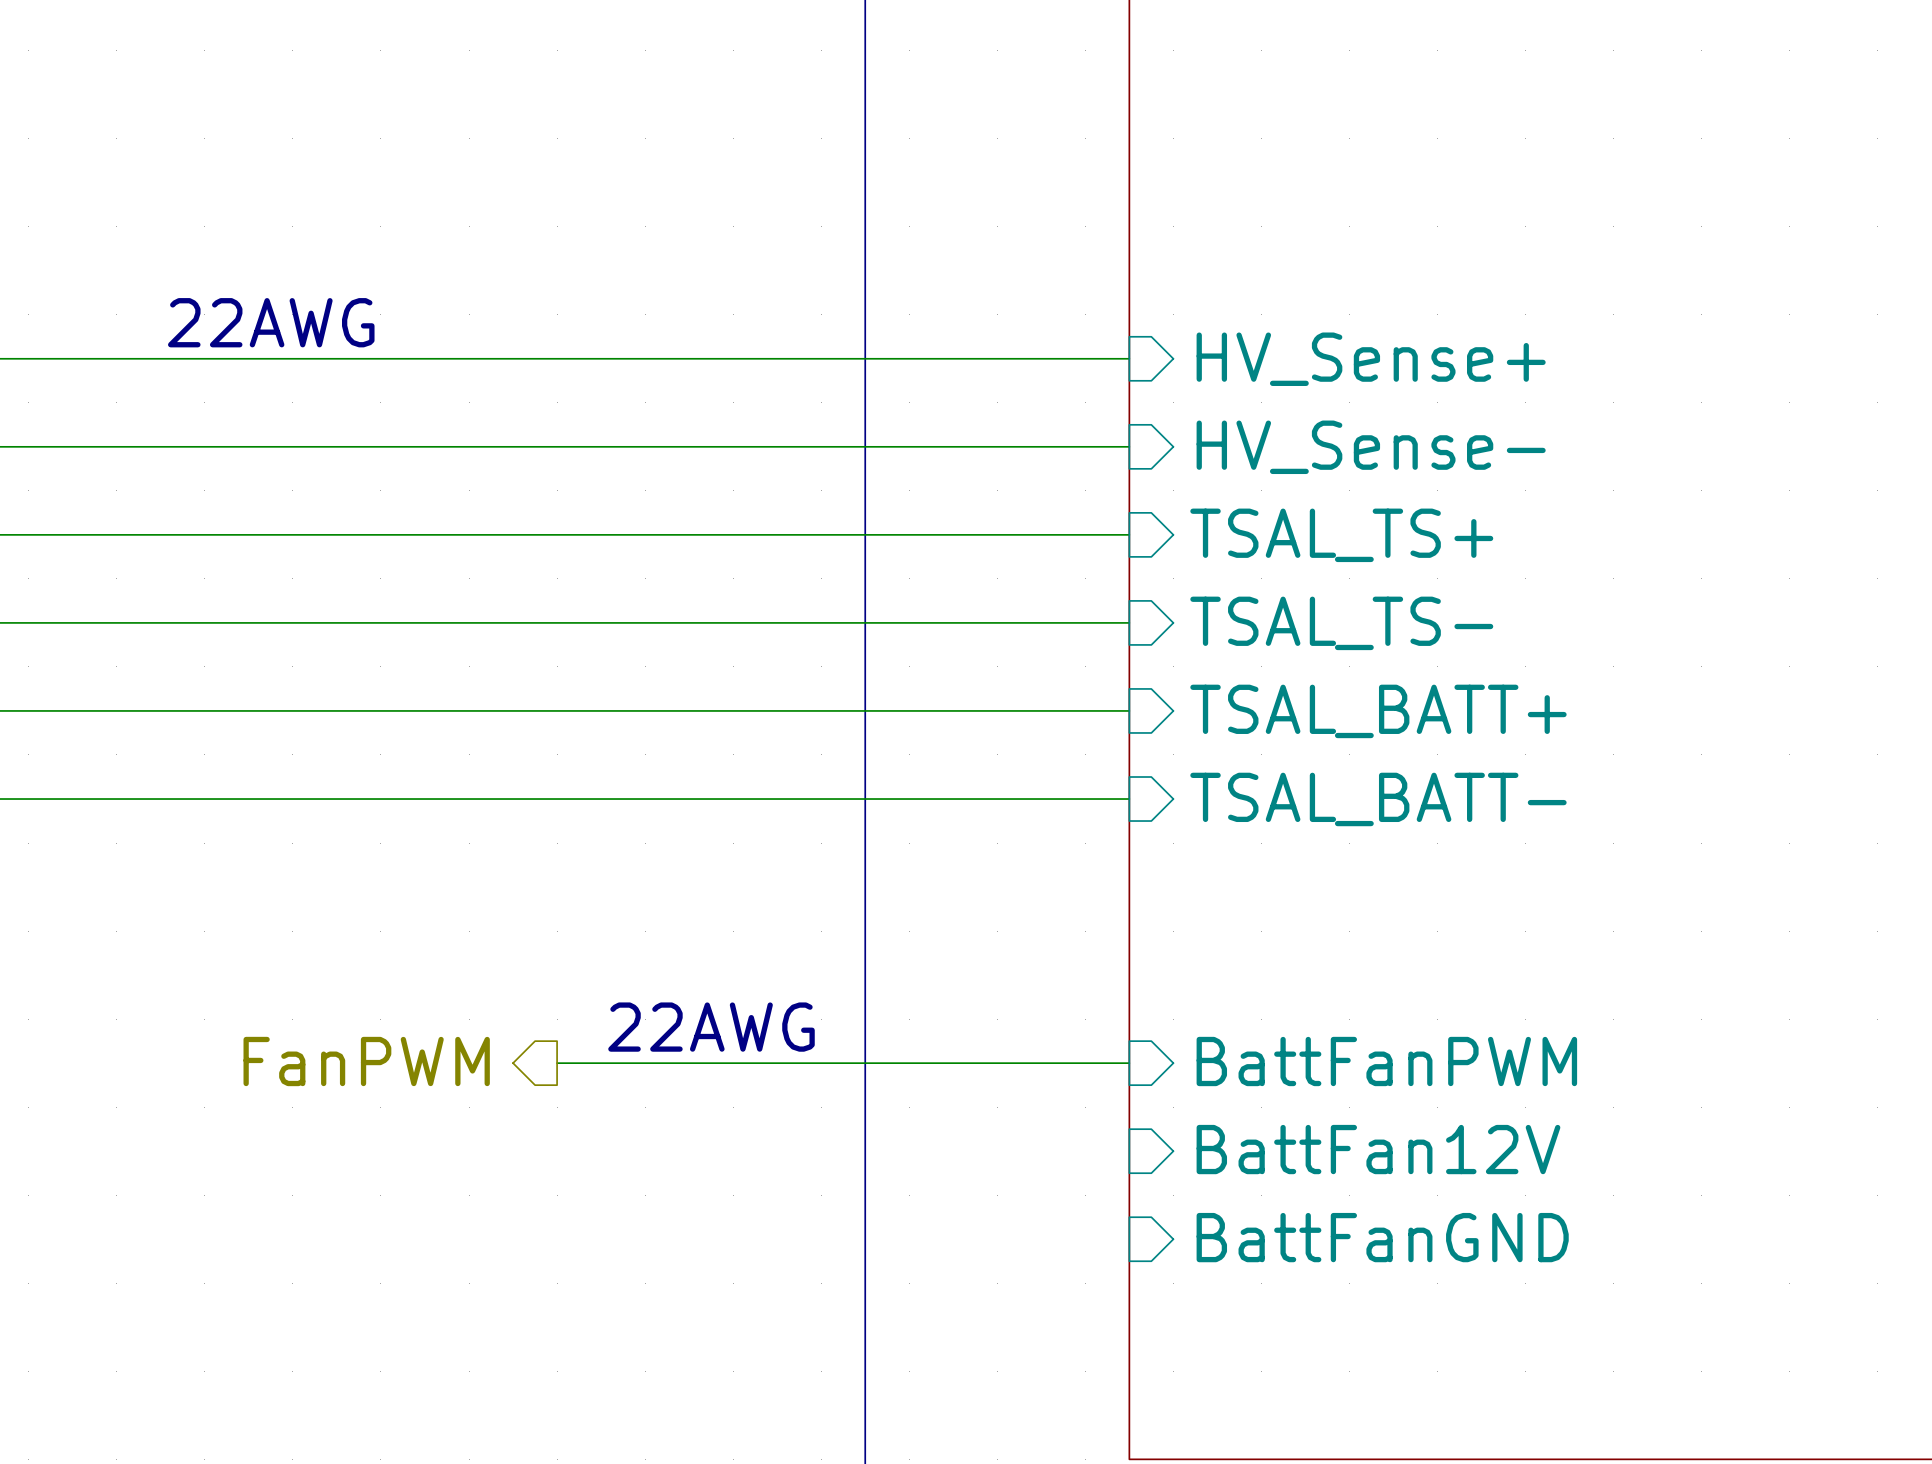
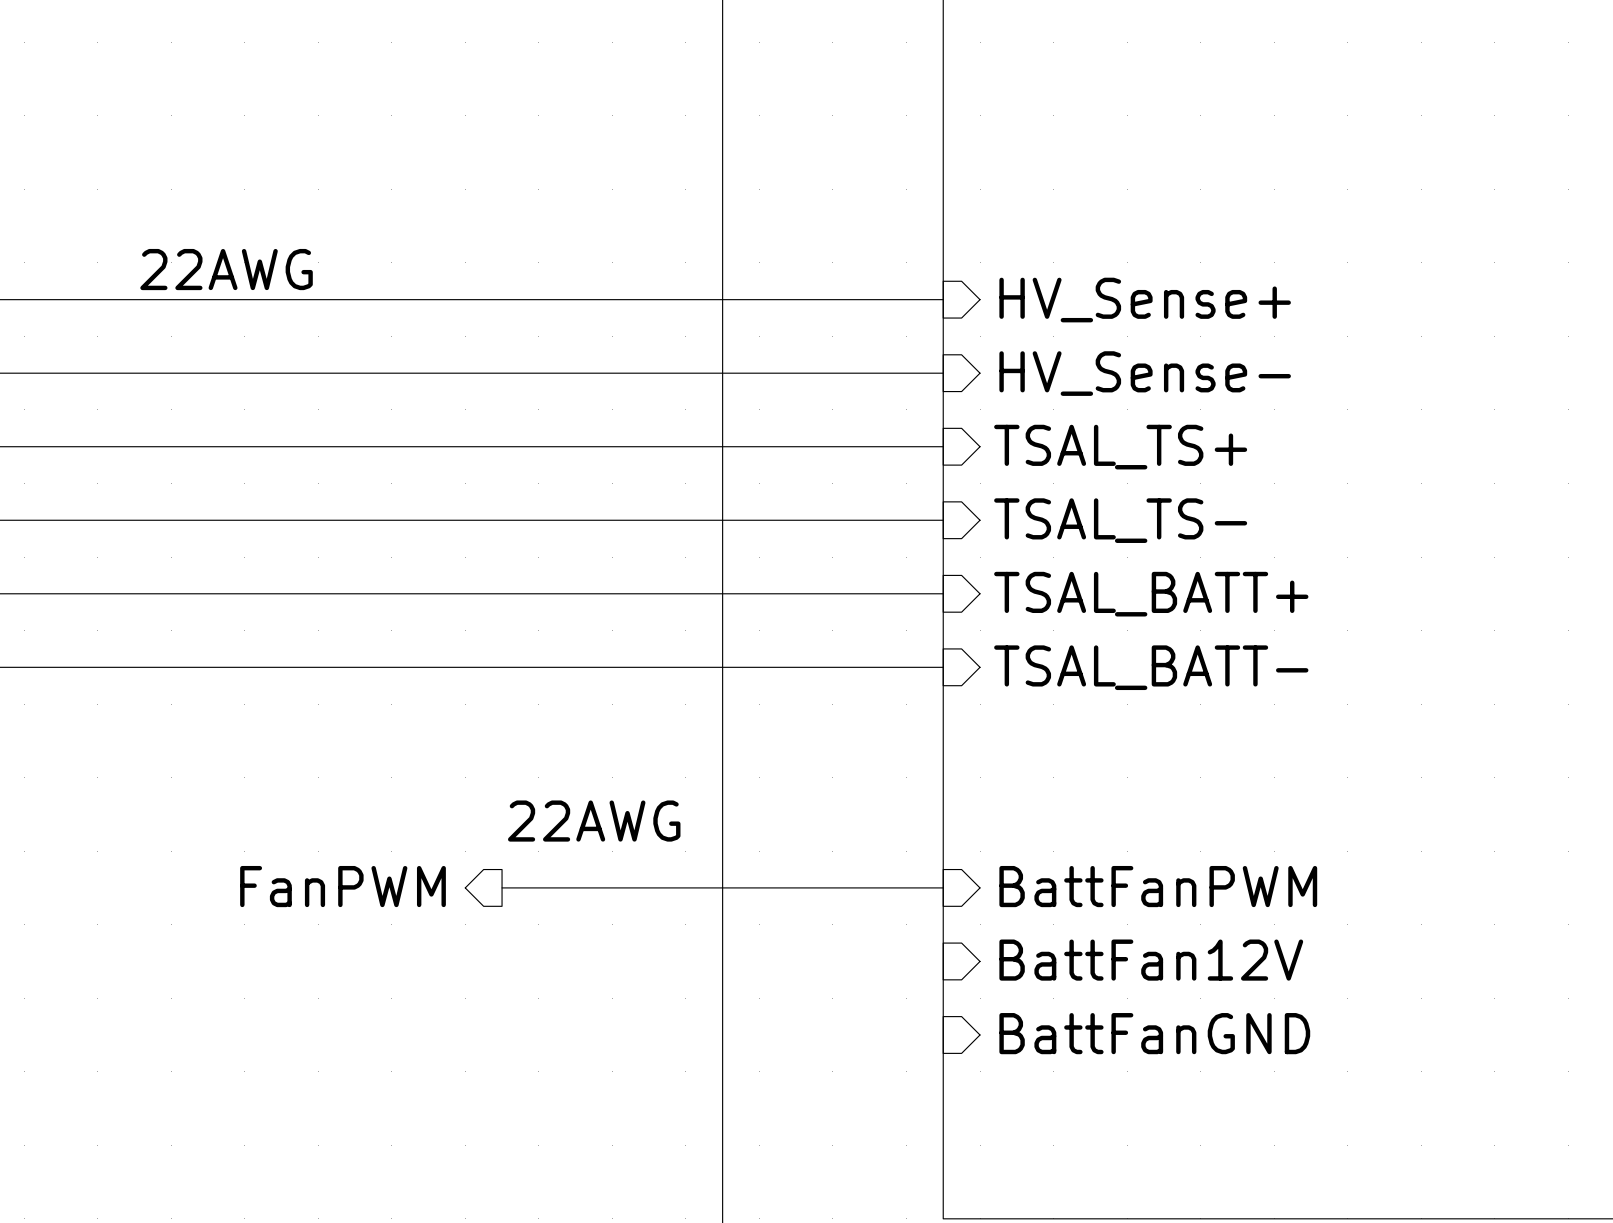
text position: 22AWG (711, 1027) -> 22AWG (594, 821)
hierarchical label position: FanPWM (366, 1061) -> FanPWM (343, 886)
wire: (557, 1063) (601, 1063) -> none

